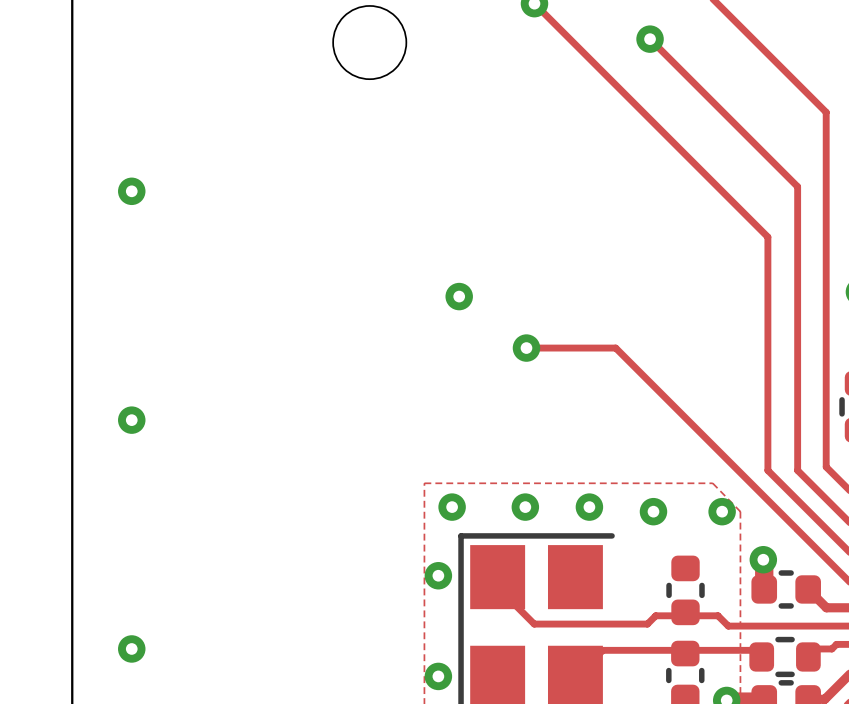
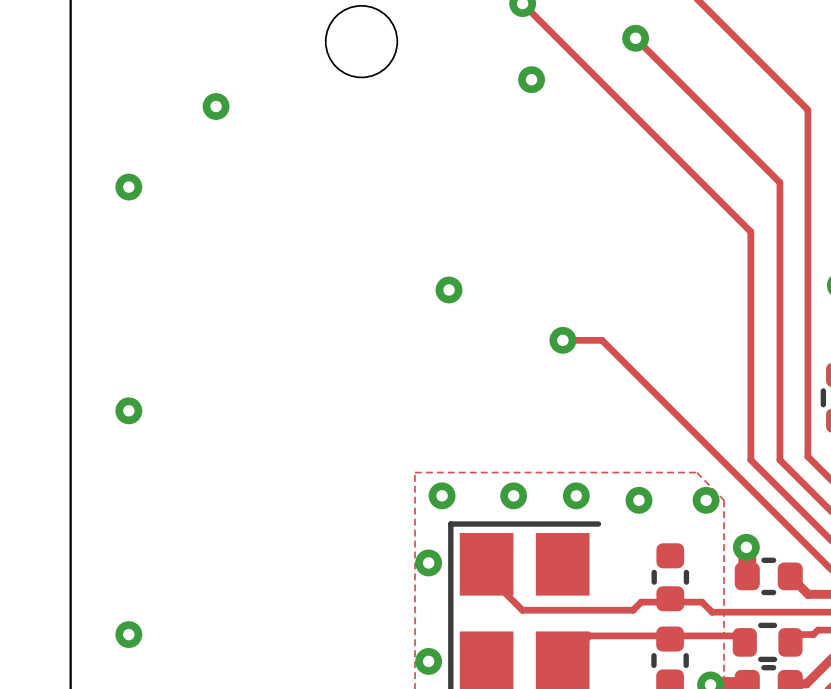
via: none -> (531, 79)
via: none -> (216, 106)
track: (526, 348) (575, 348) -> none
via position: (526, 348) -> (562, 340)

